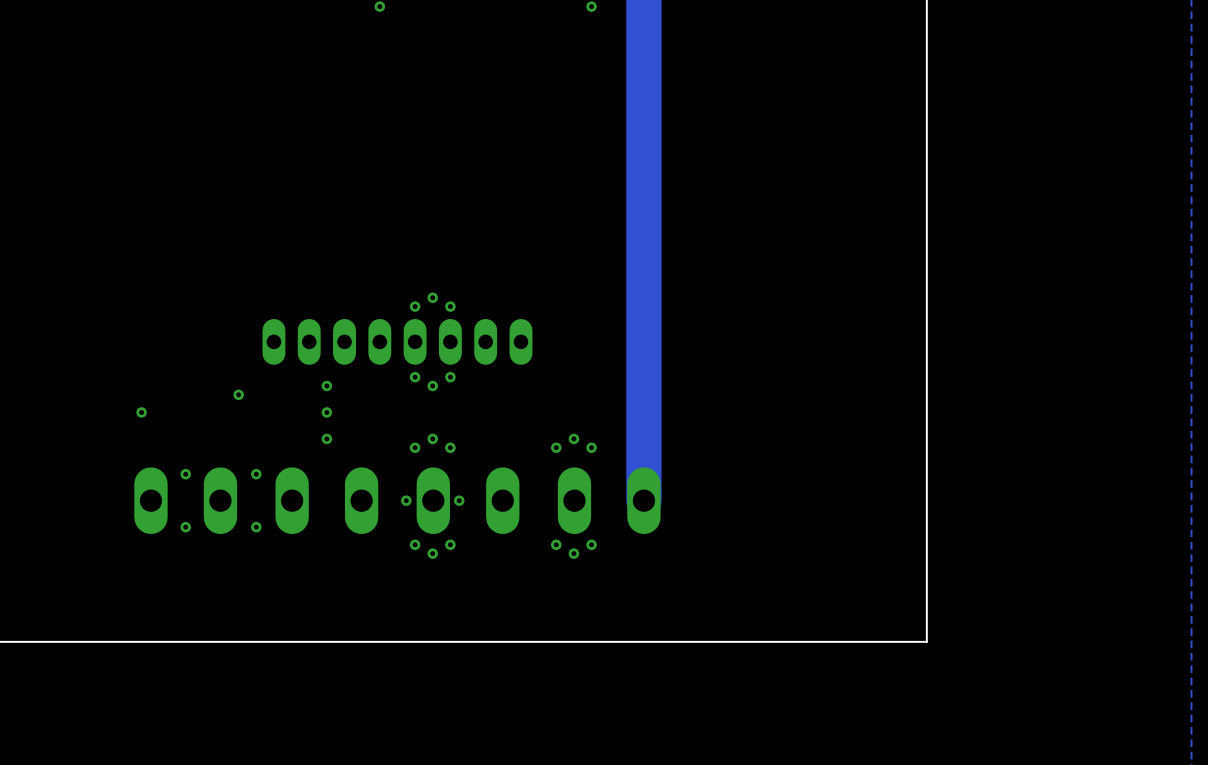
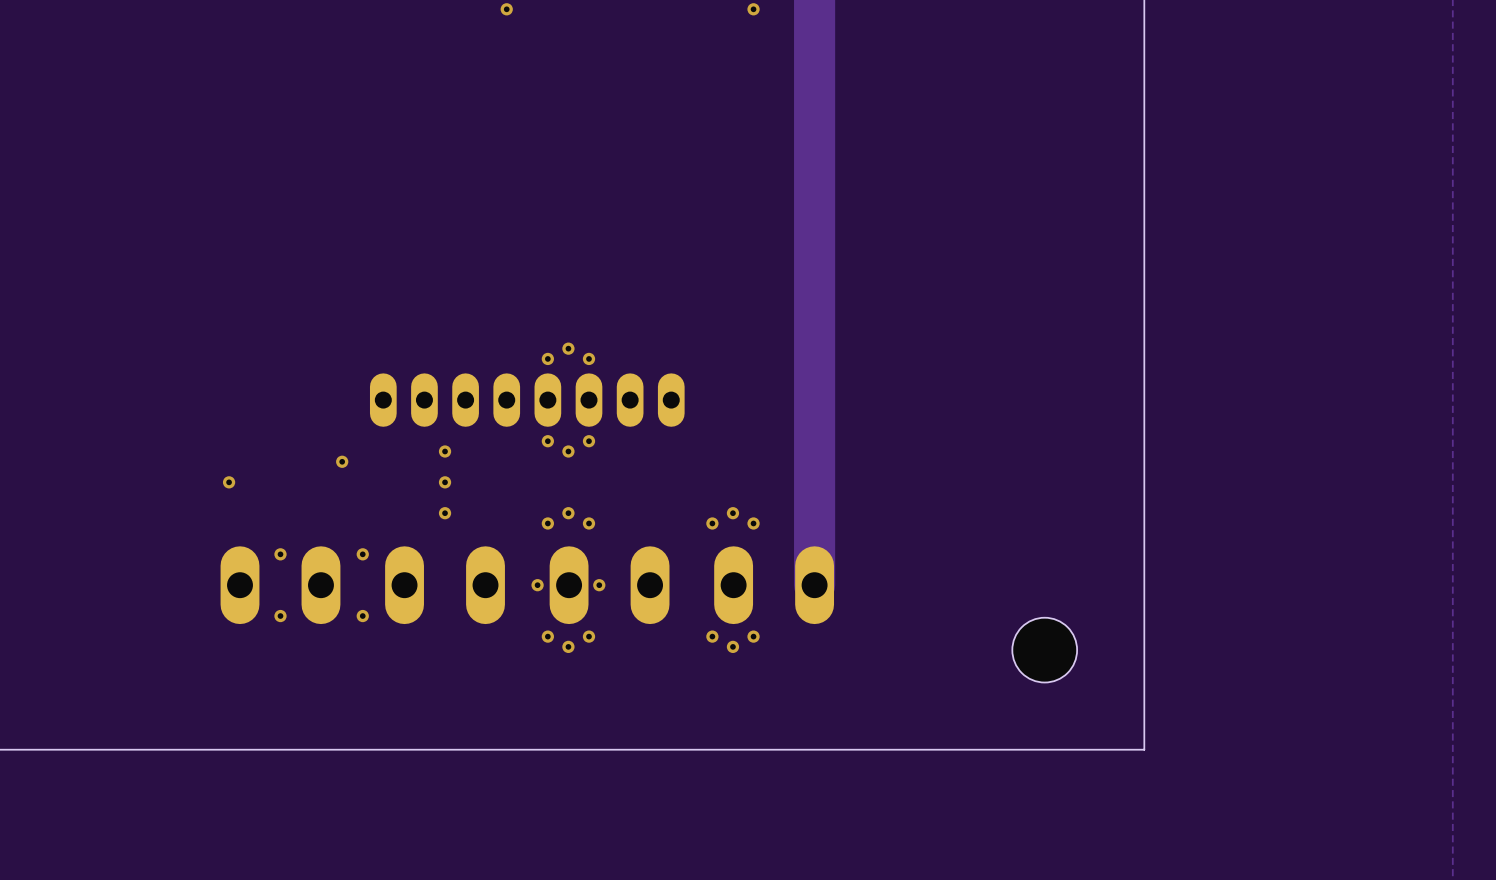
hole: none -> (1044, 650)

